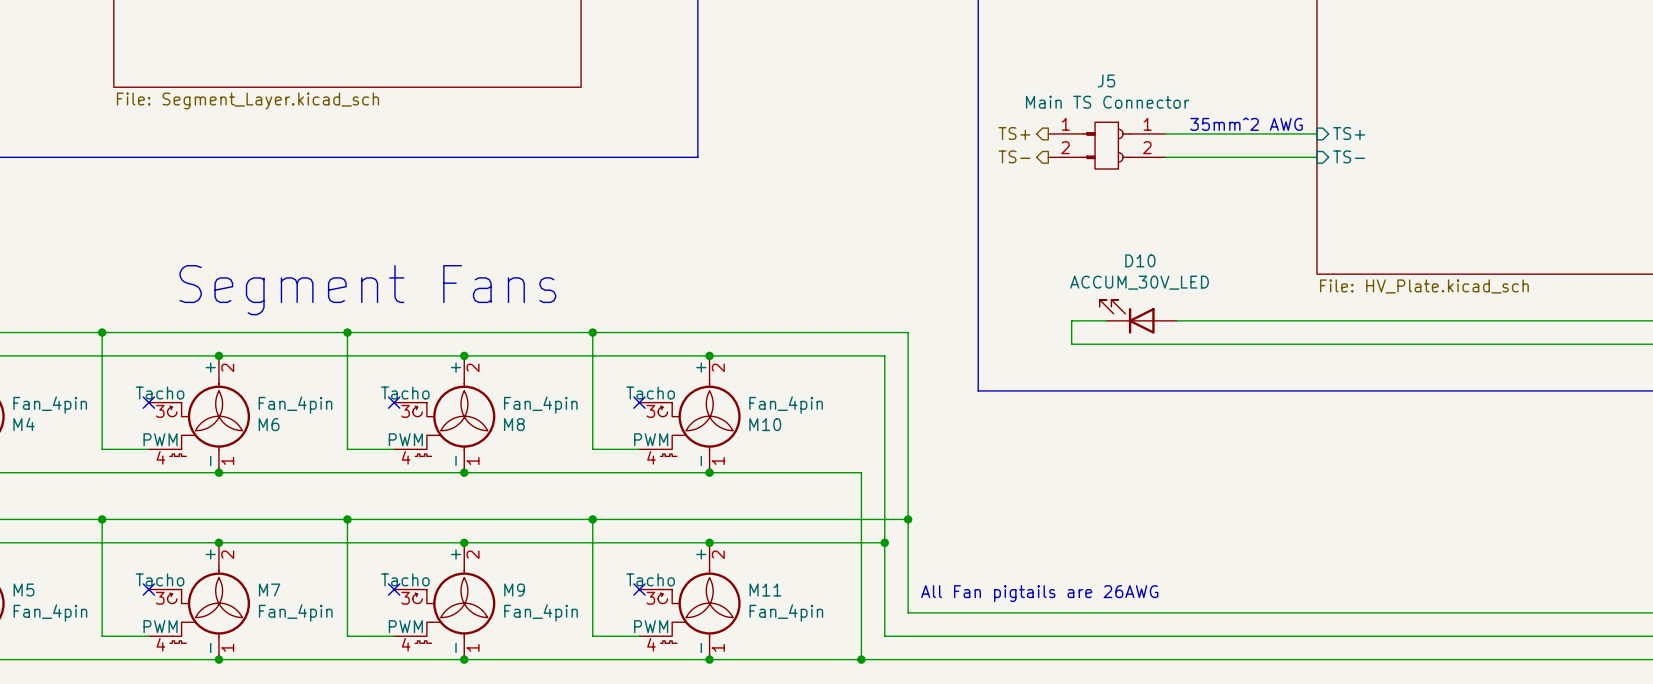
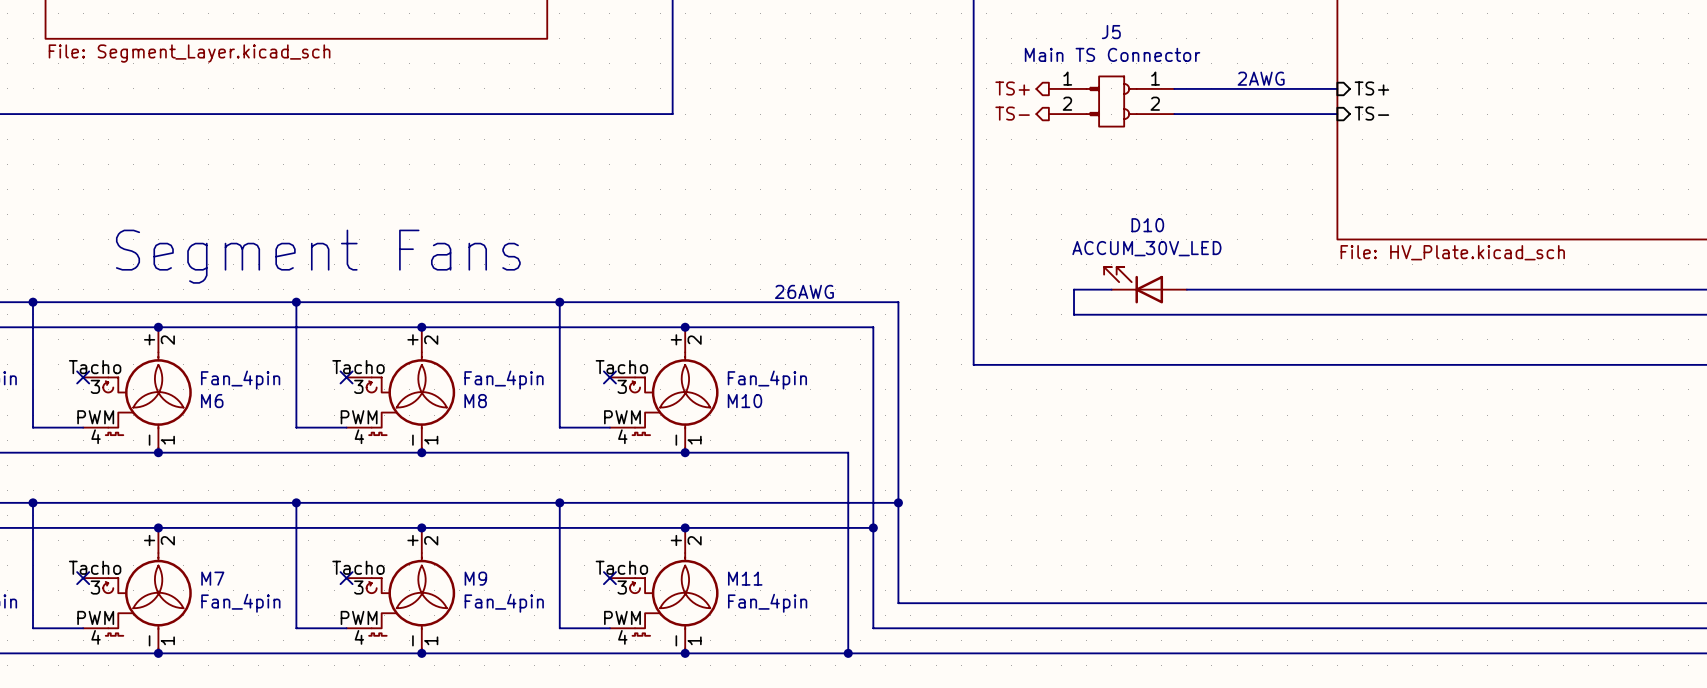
text: none -> 2AWG (1261, 78)
text: 35mm^2 AWG (1246, 124) -> none
text: none -> 26AWG (804, 291)
text: All Fan pigtails are 26AWG (1039, 593) -> none

